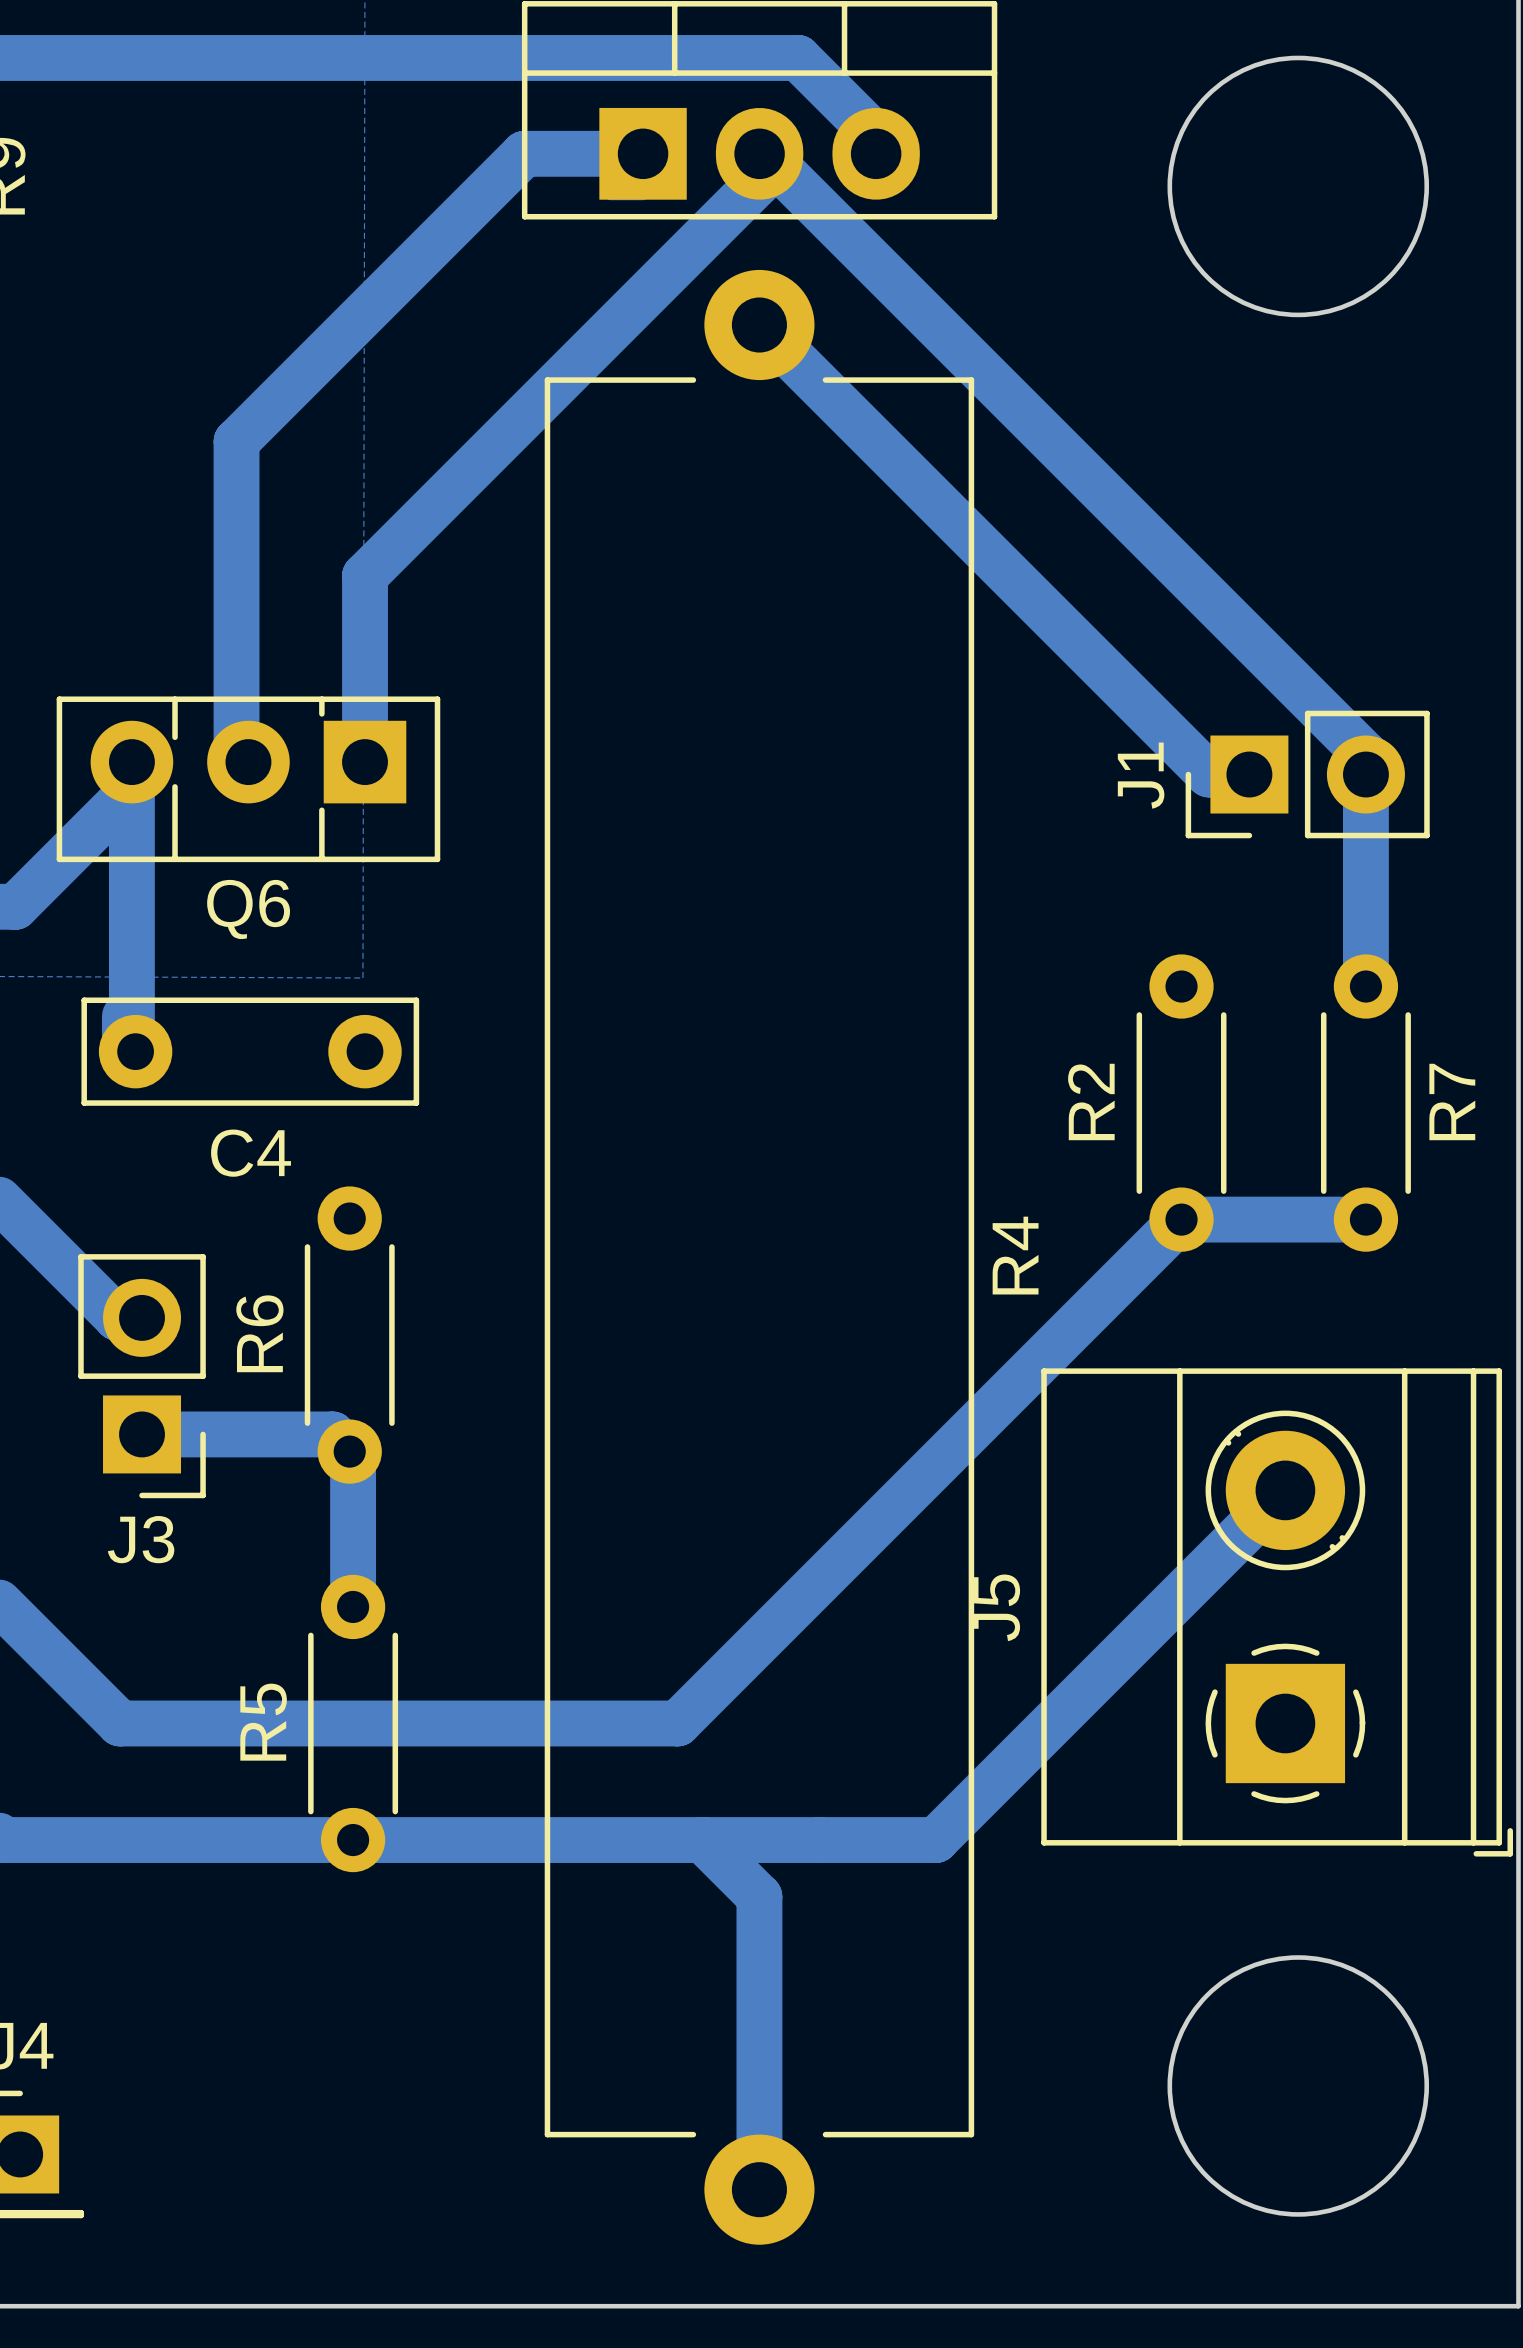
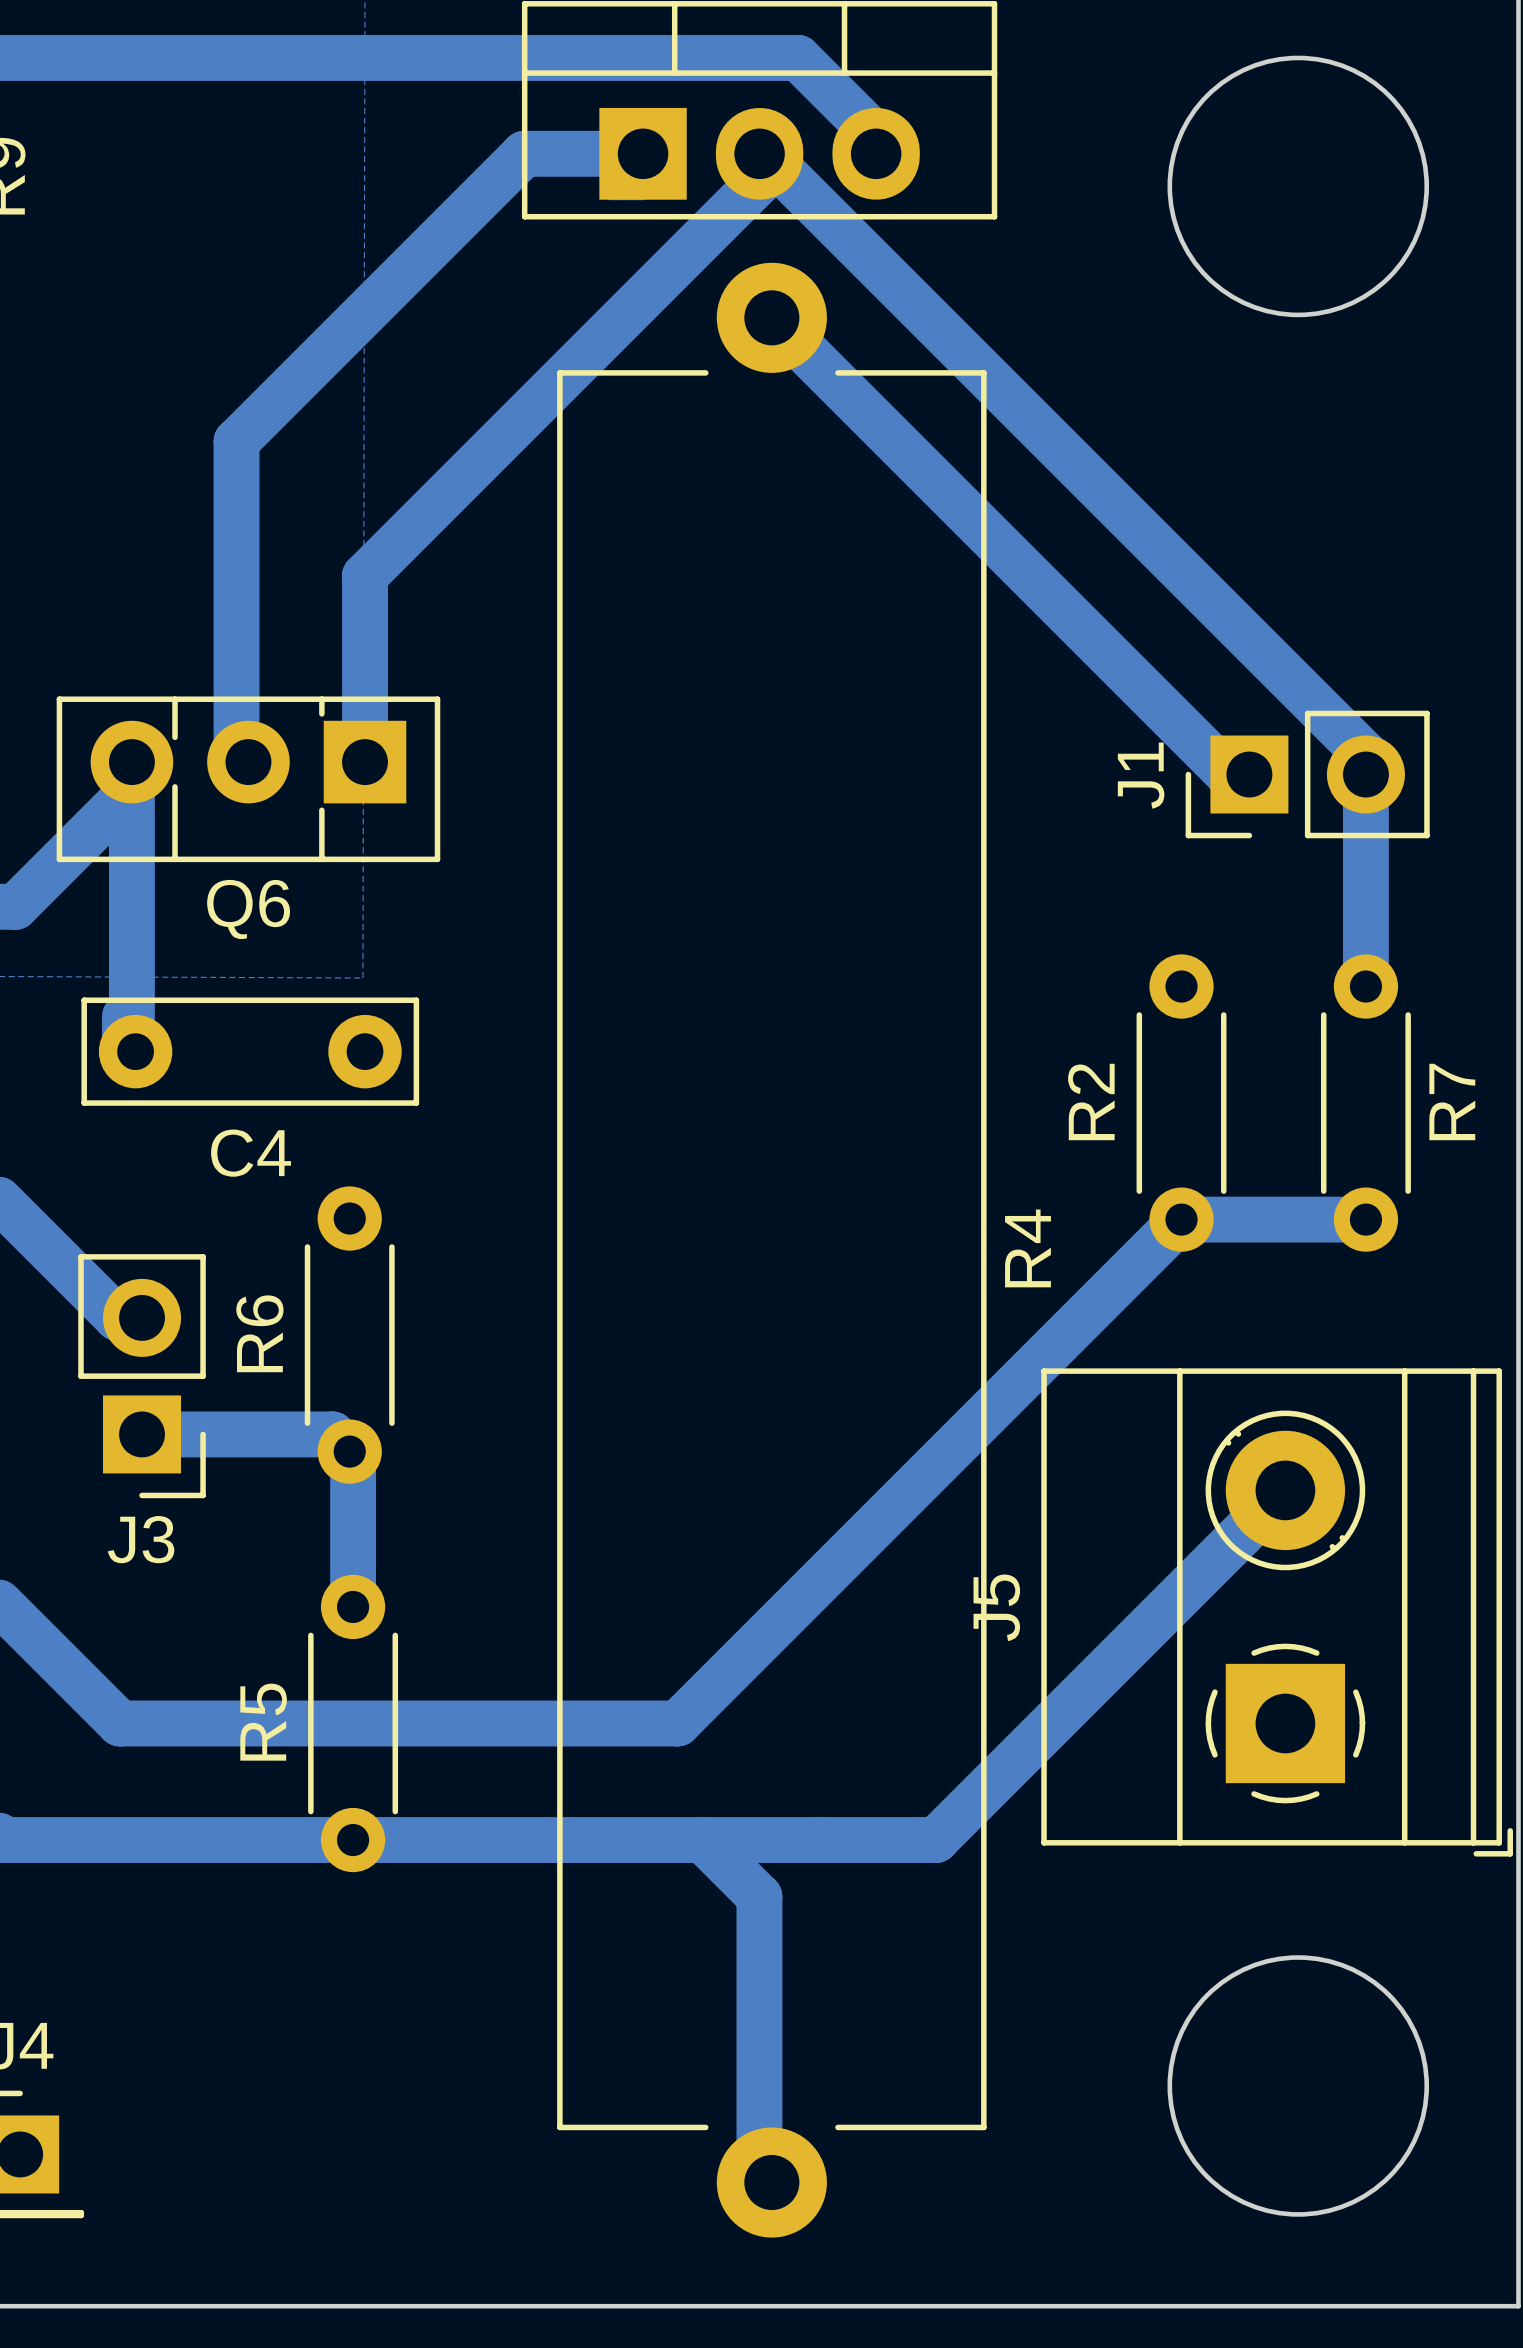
bottom track: (759, 325) (1208, 774) (1228, 774) -> (771, 317) (1228, 774)
R4 position: (759, 1257) -> (771, 1250)

